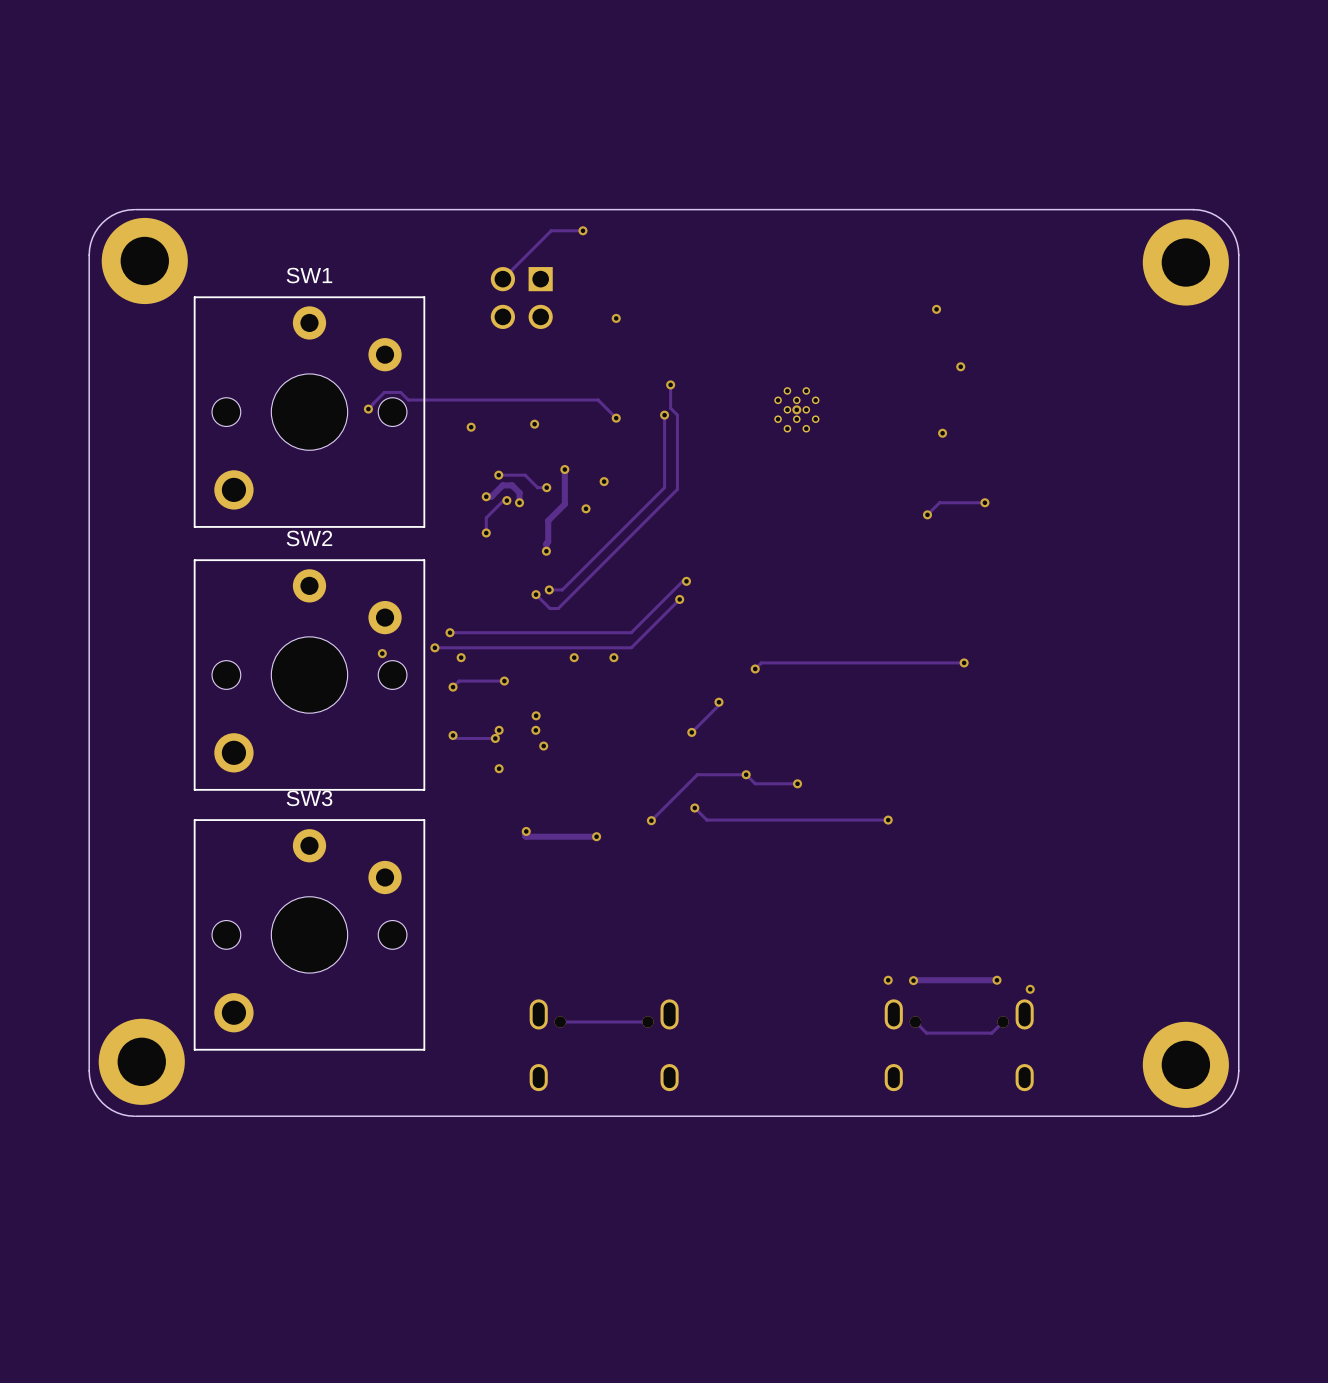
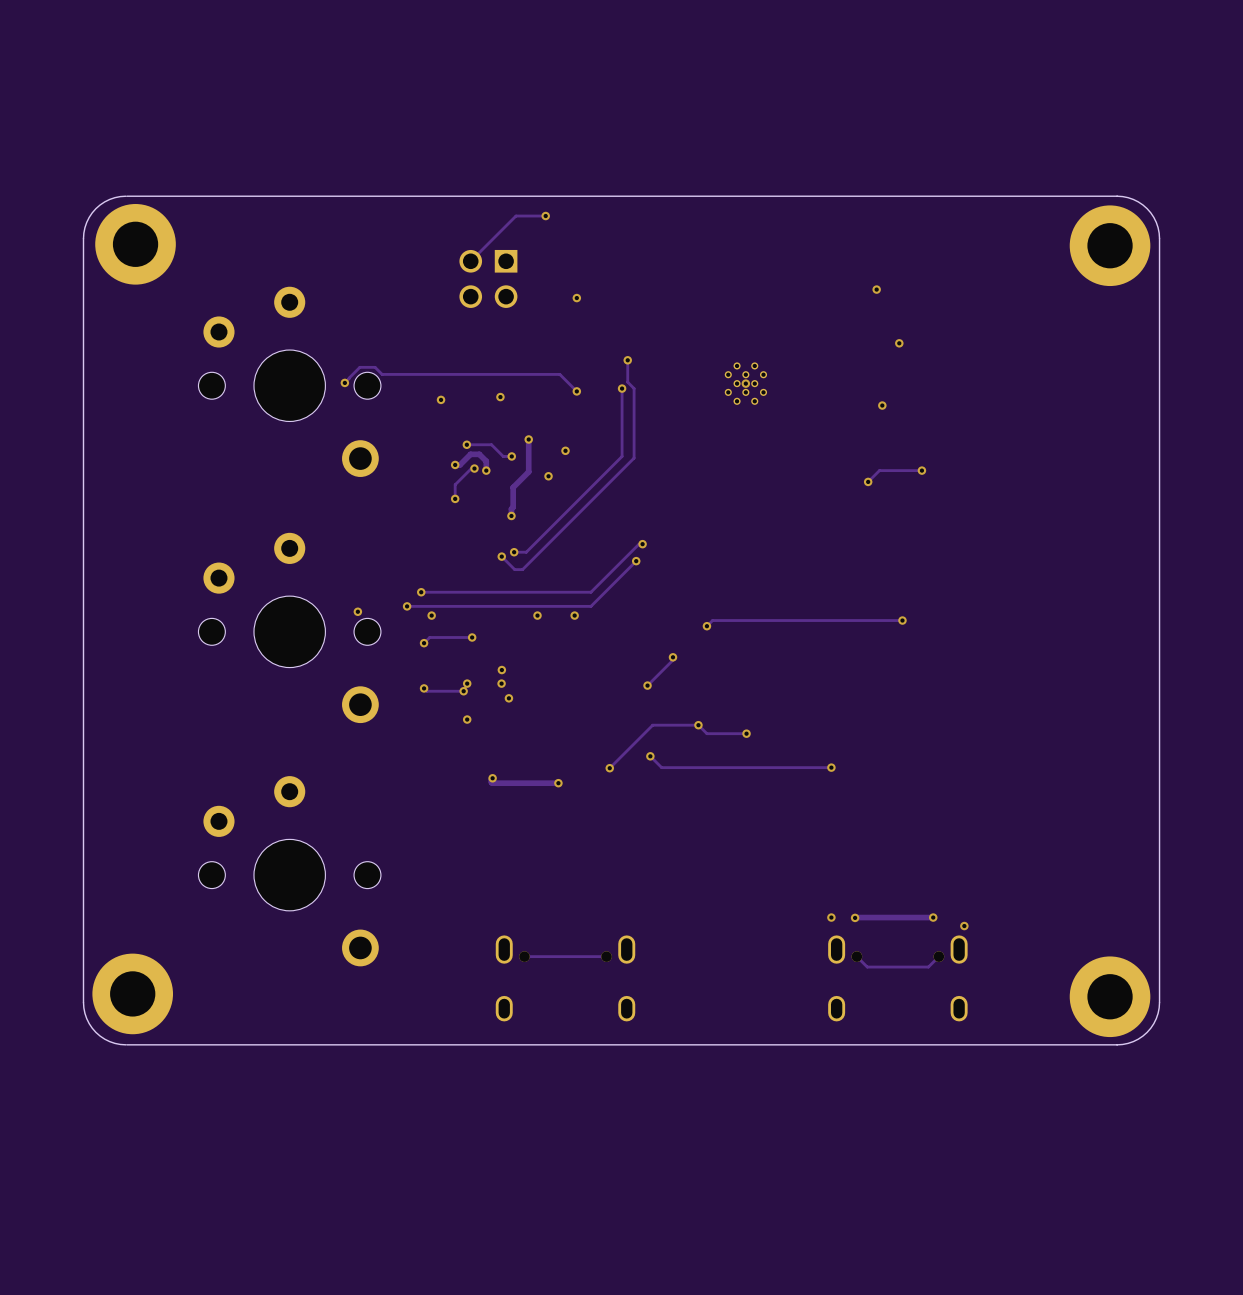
SW1 side: bottom (309, 412) -> top (289, 381)
SW2 side: bottom (309, 675) -> top (289, 627)
SW3 side: bottom (309, 934) -> top (289, 871)

